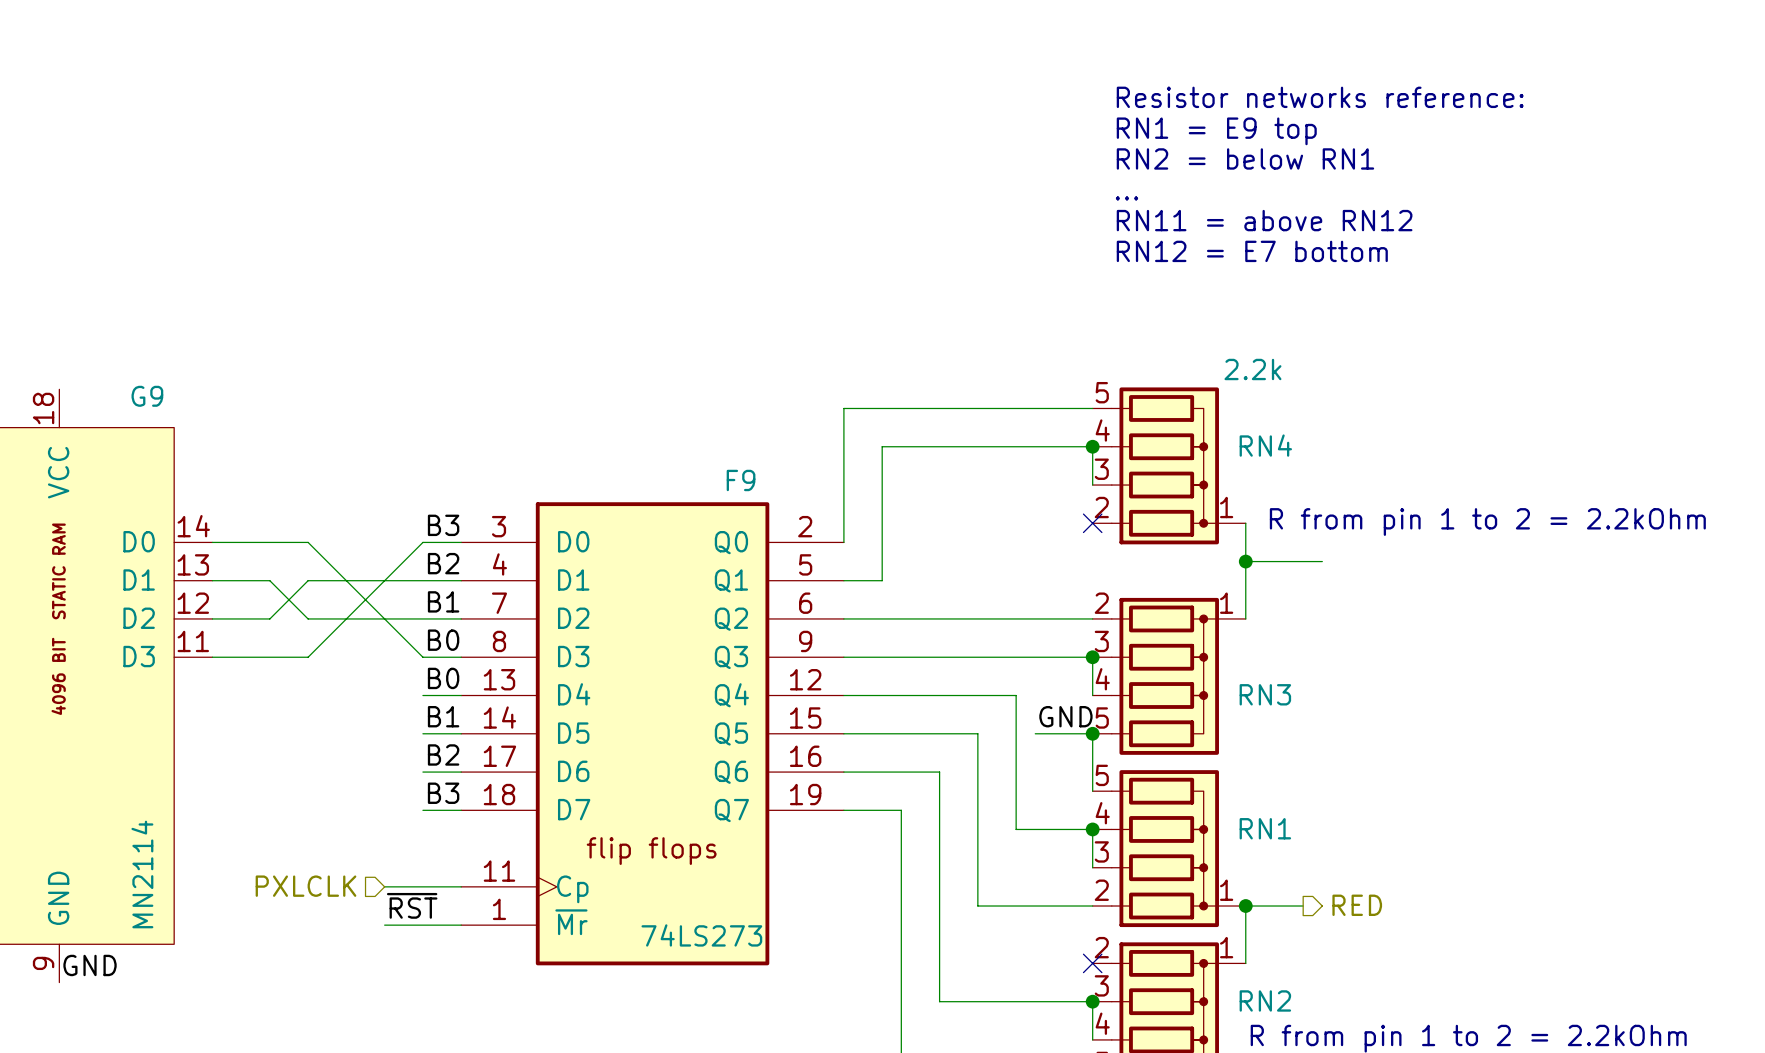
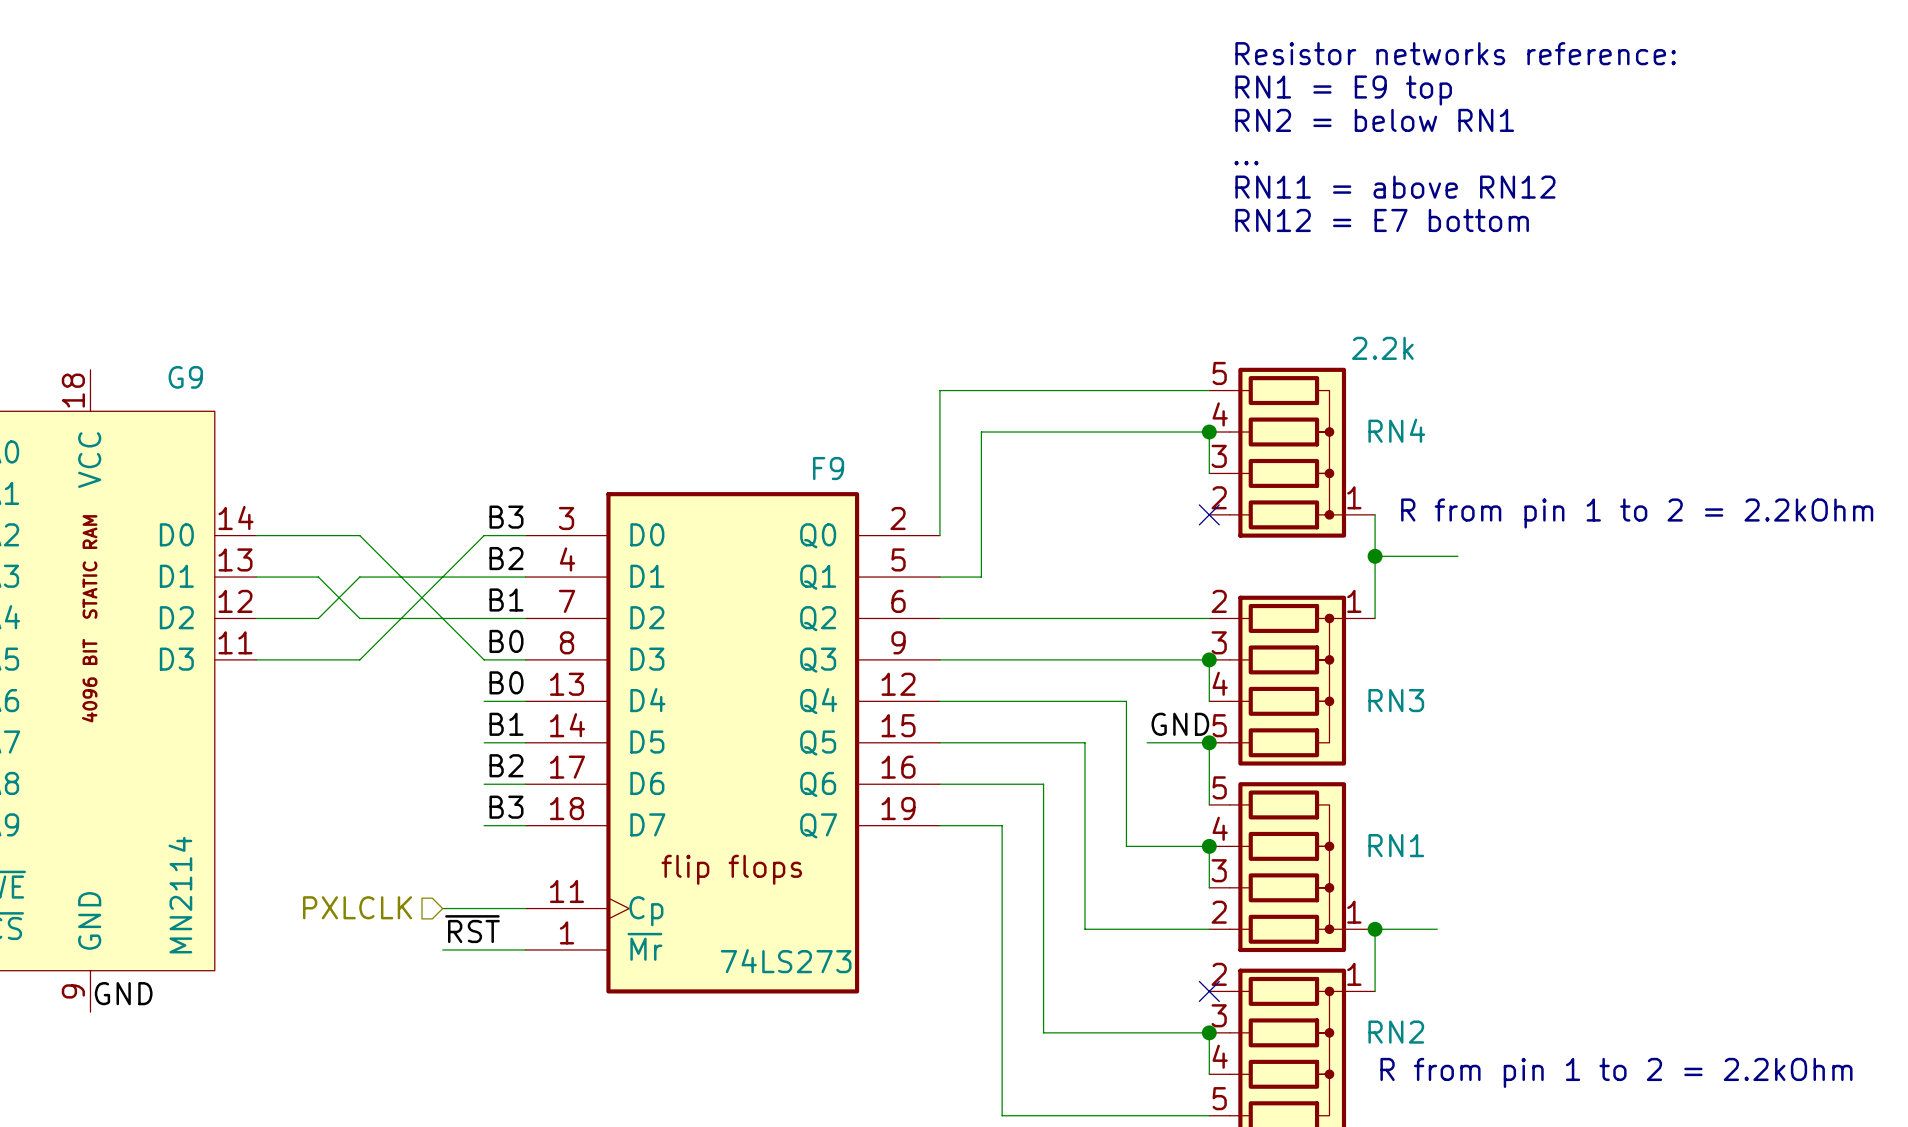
hierarchical label: RED (1357, 905) -> none

